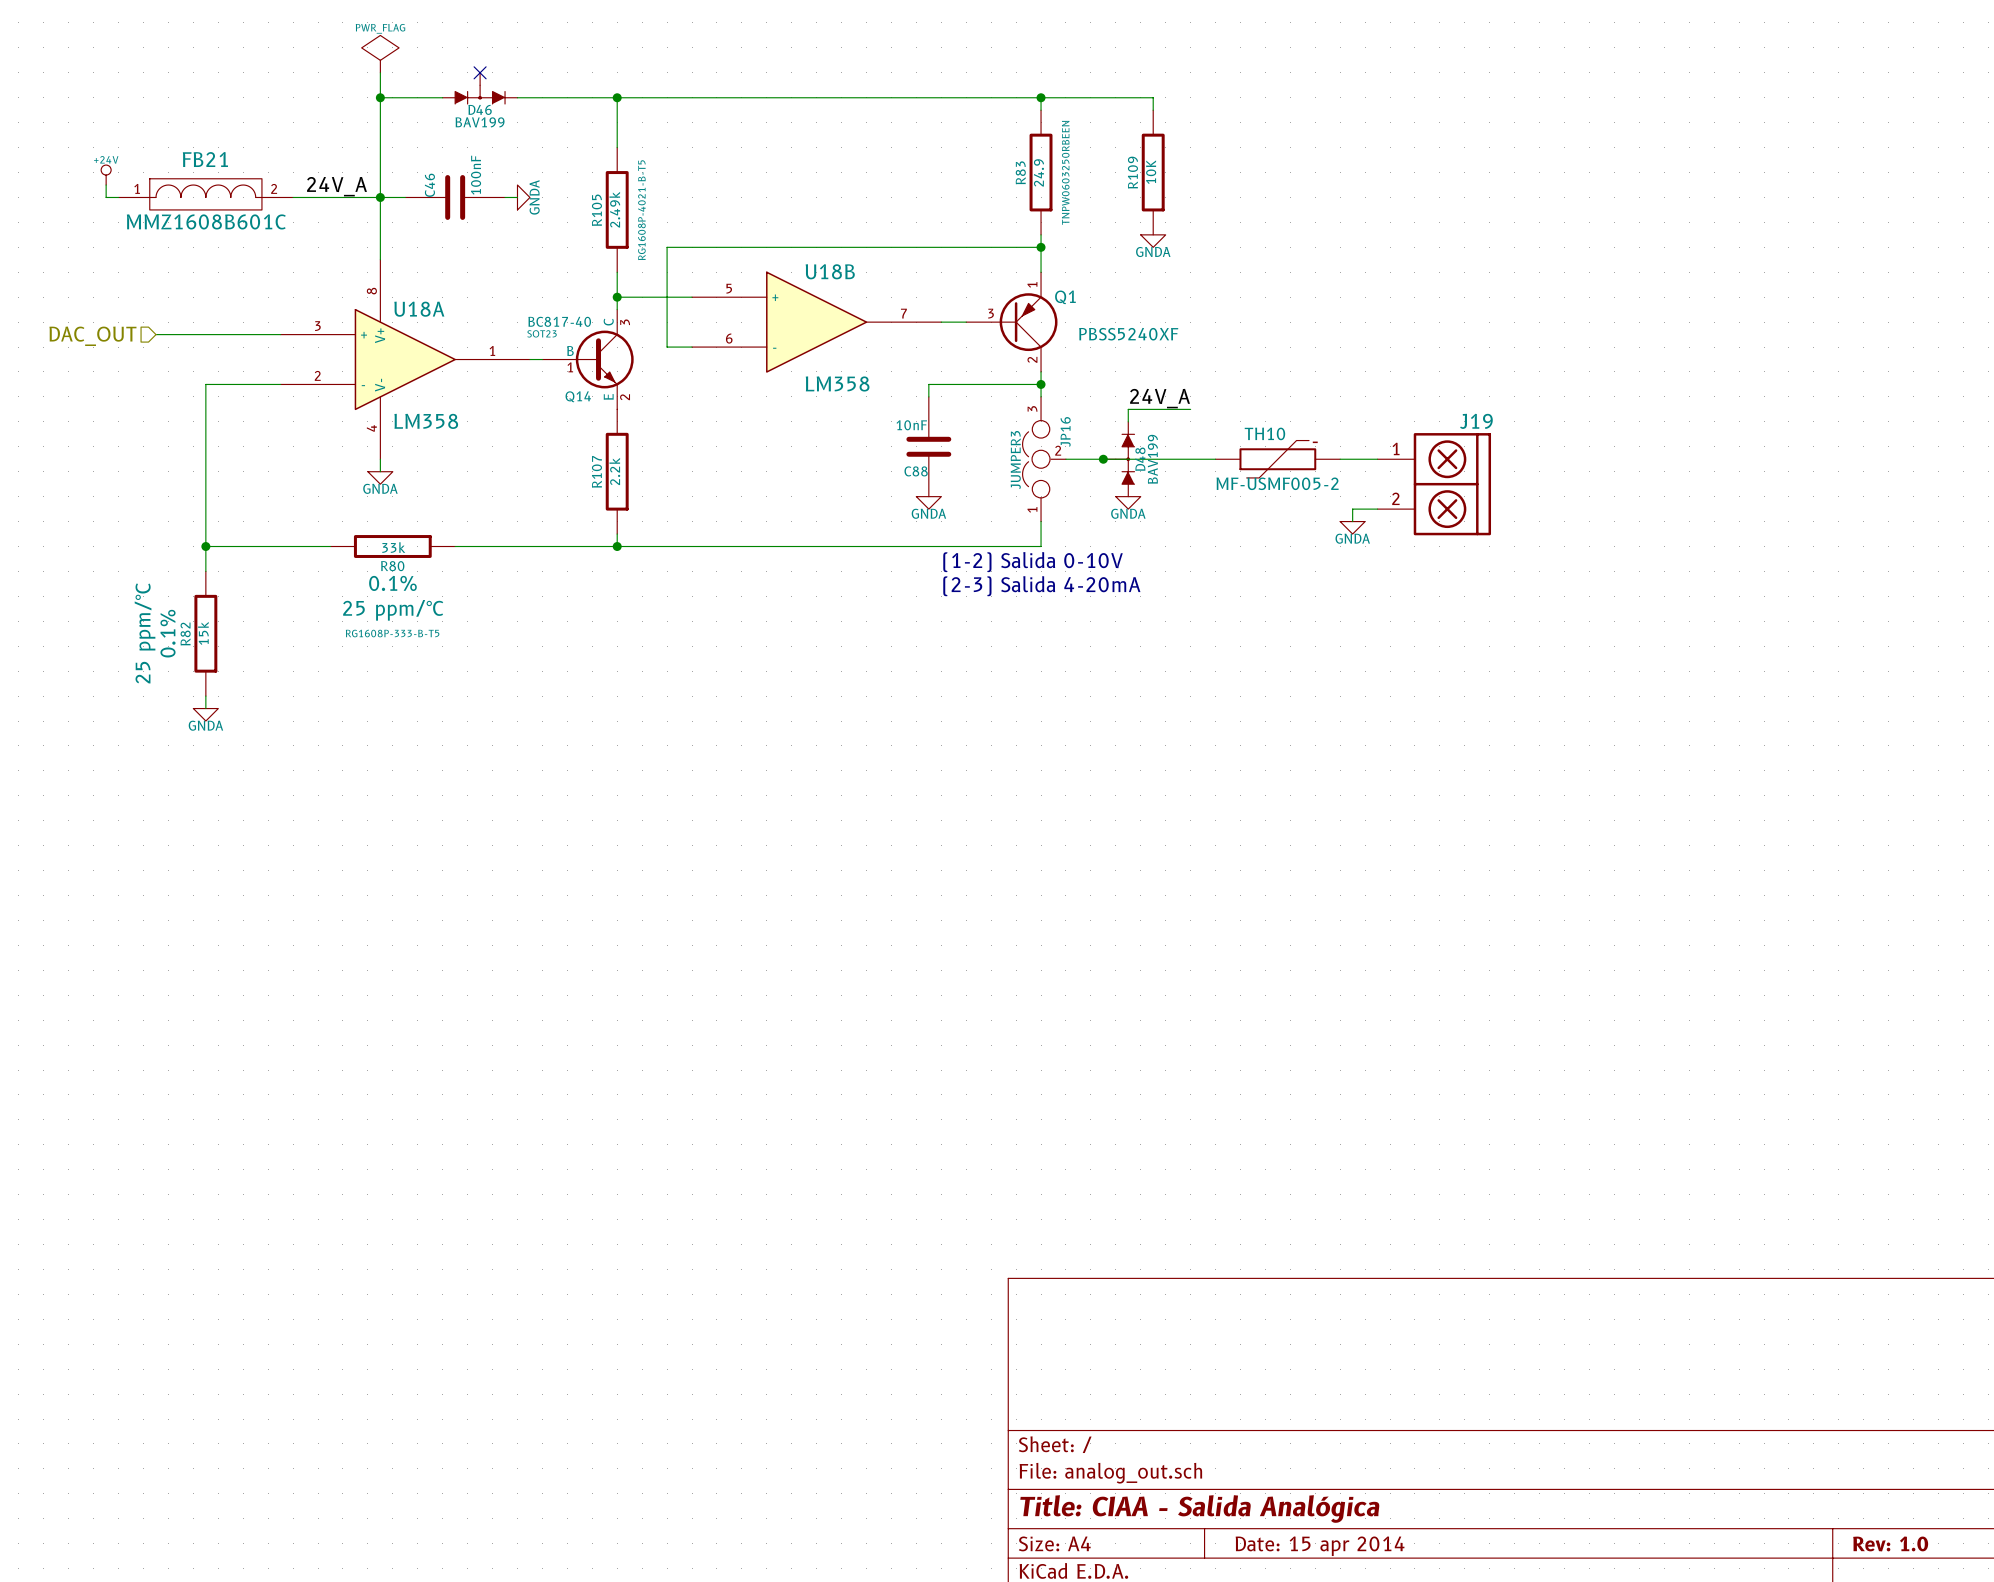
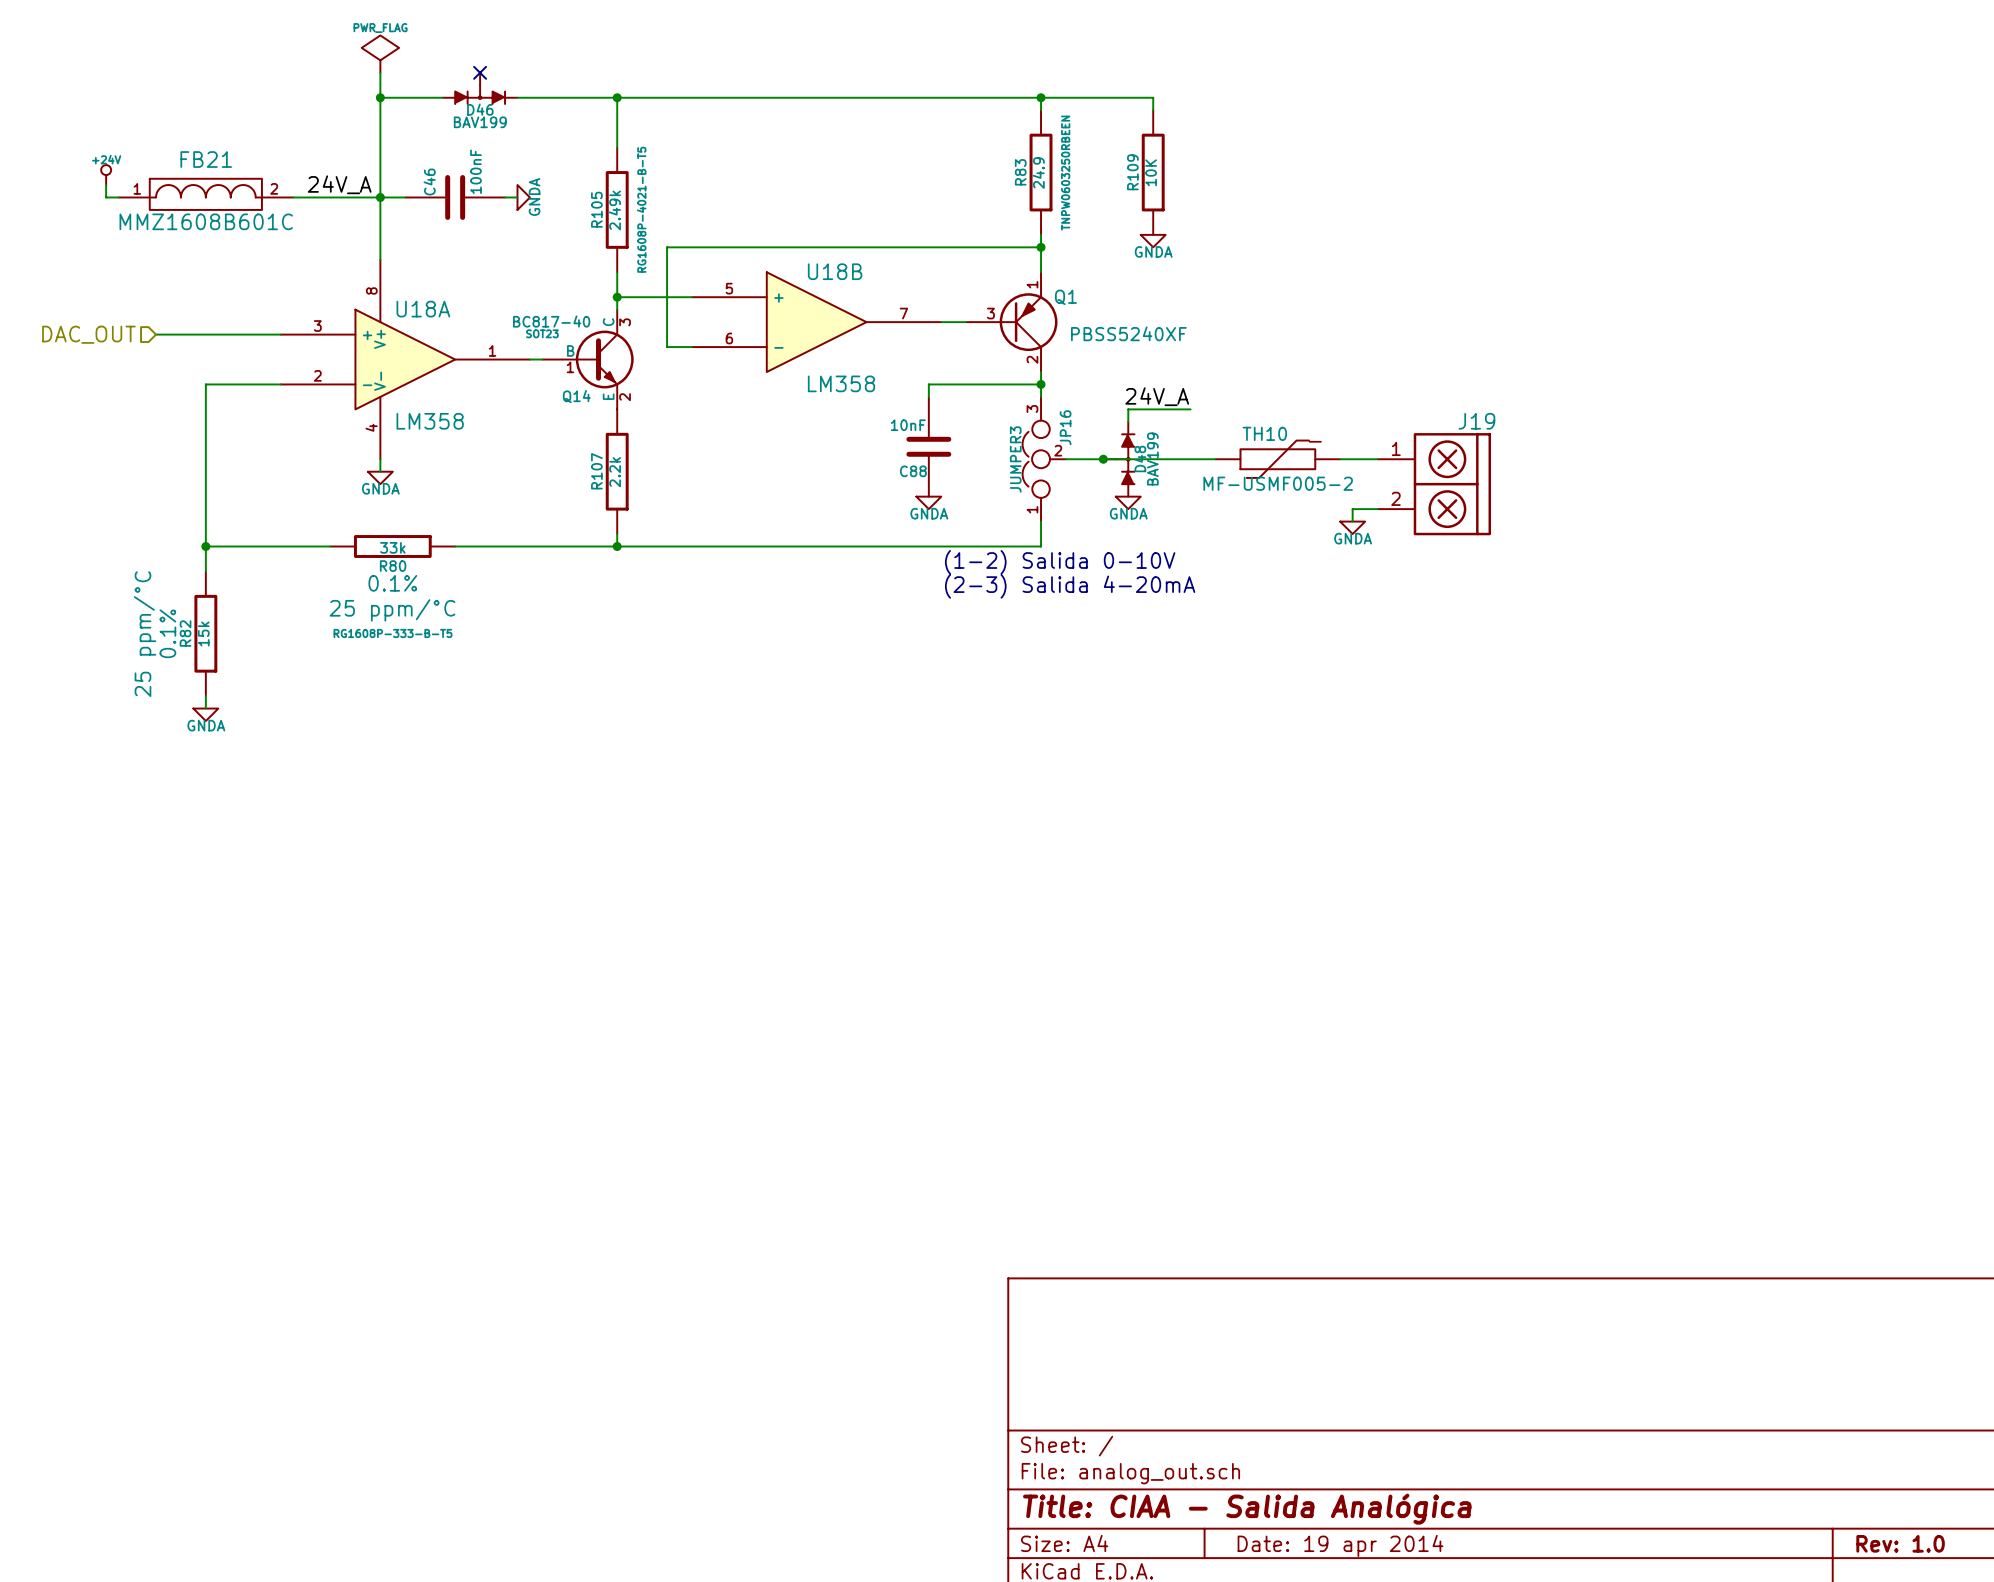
title block: Date: 15 apr 2014 (1320, 1546) -> Date: 19 apr 2014 (1340, 1545)

